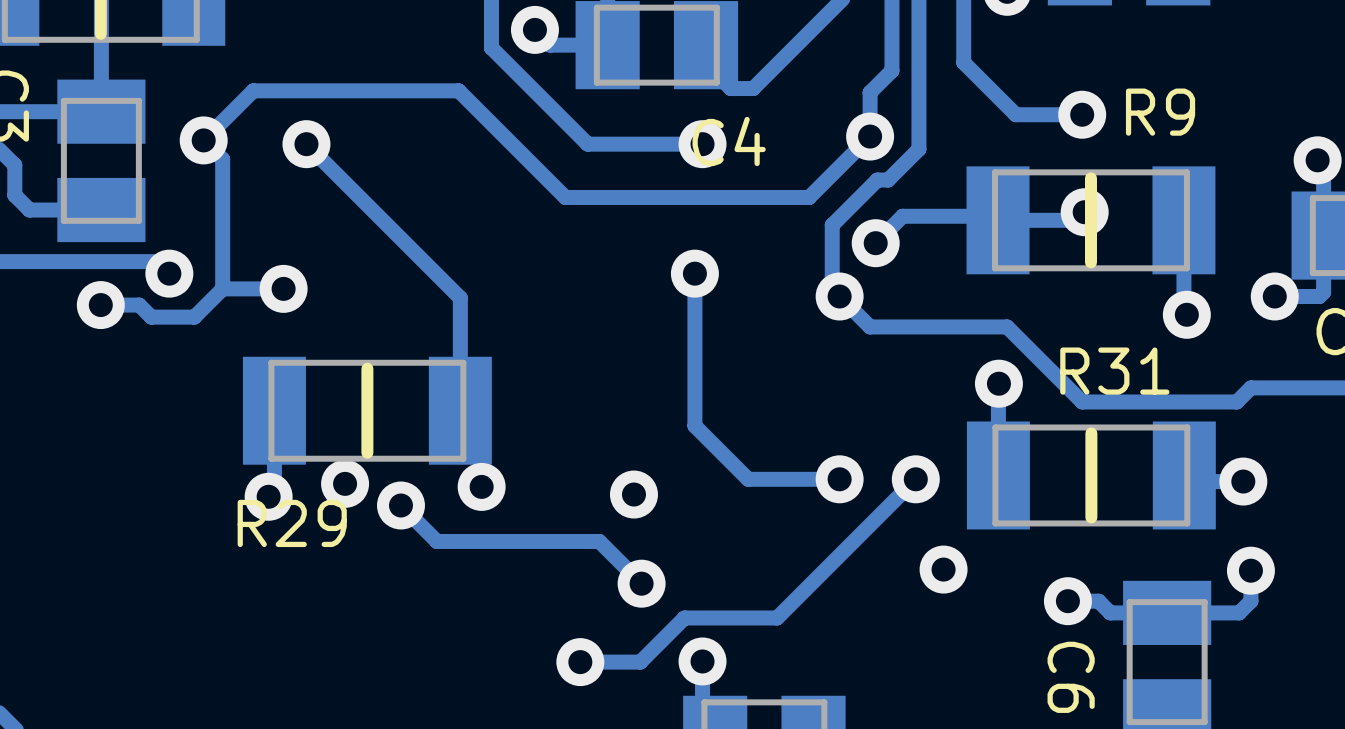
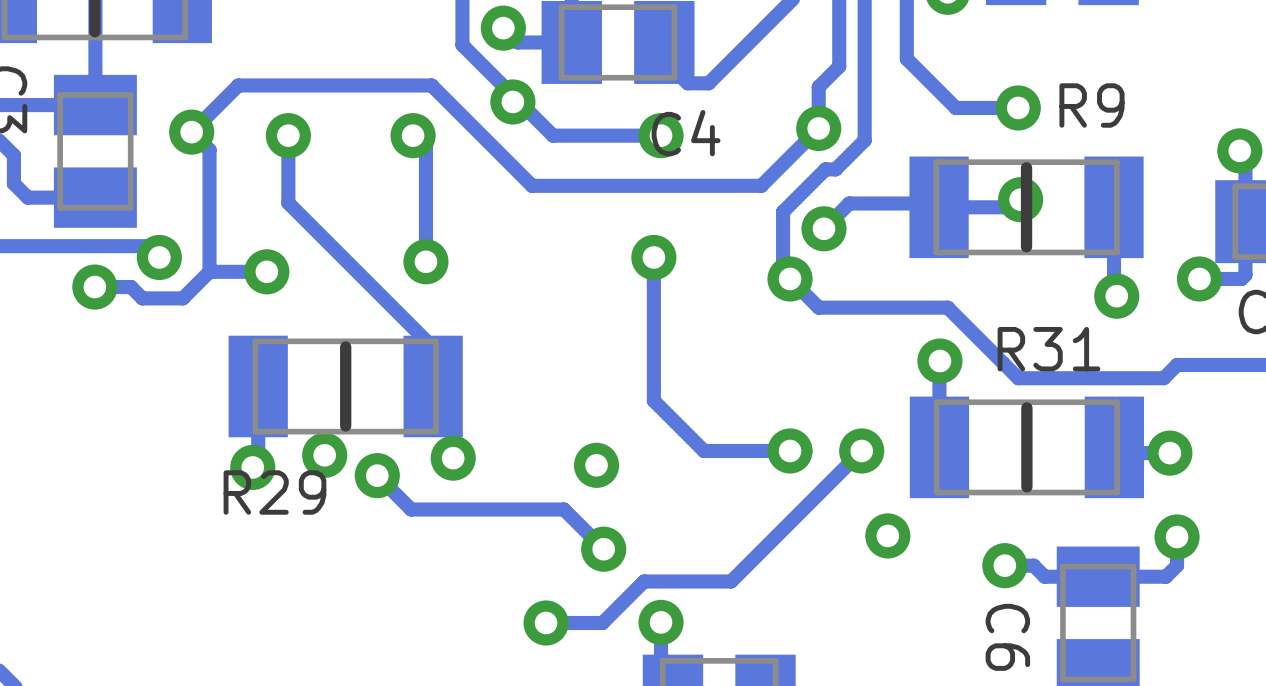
via: none -> (512, 101)
track: (306, 144) (460, 298) (460, 369) -> (288, 135) (288, 203) (433, 347)
track: none -> (413, 135) (425, 148) (425, 261)
via: none -> (413, 135)
via: none -> (425, 261)

